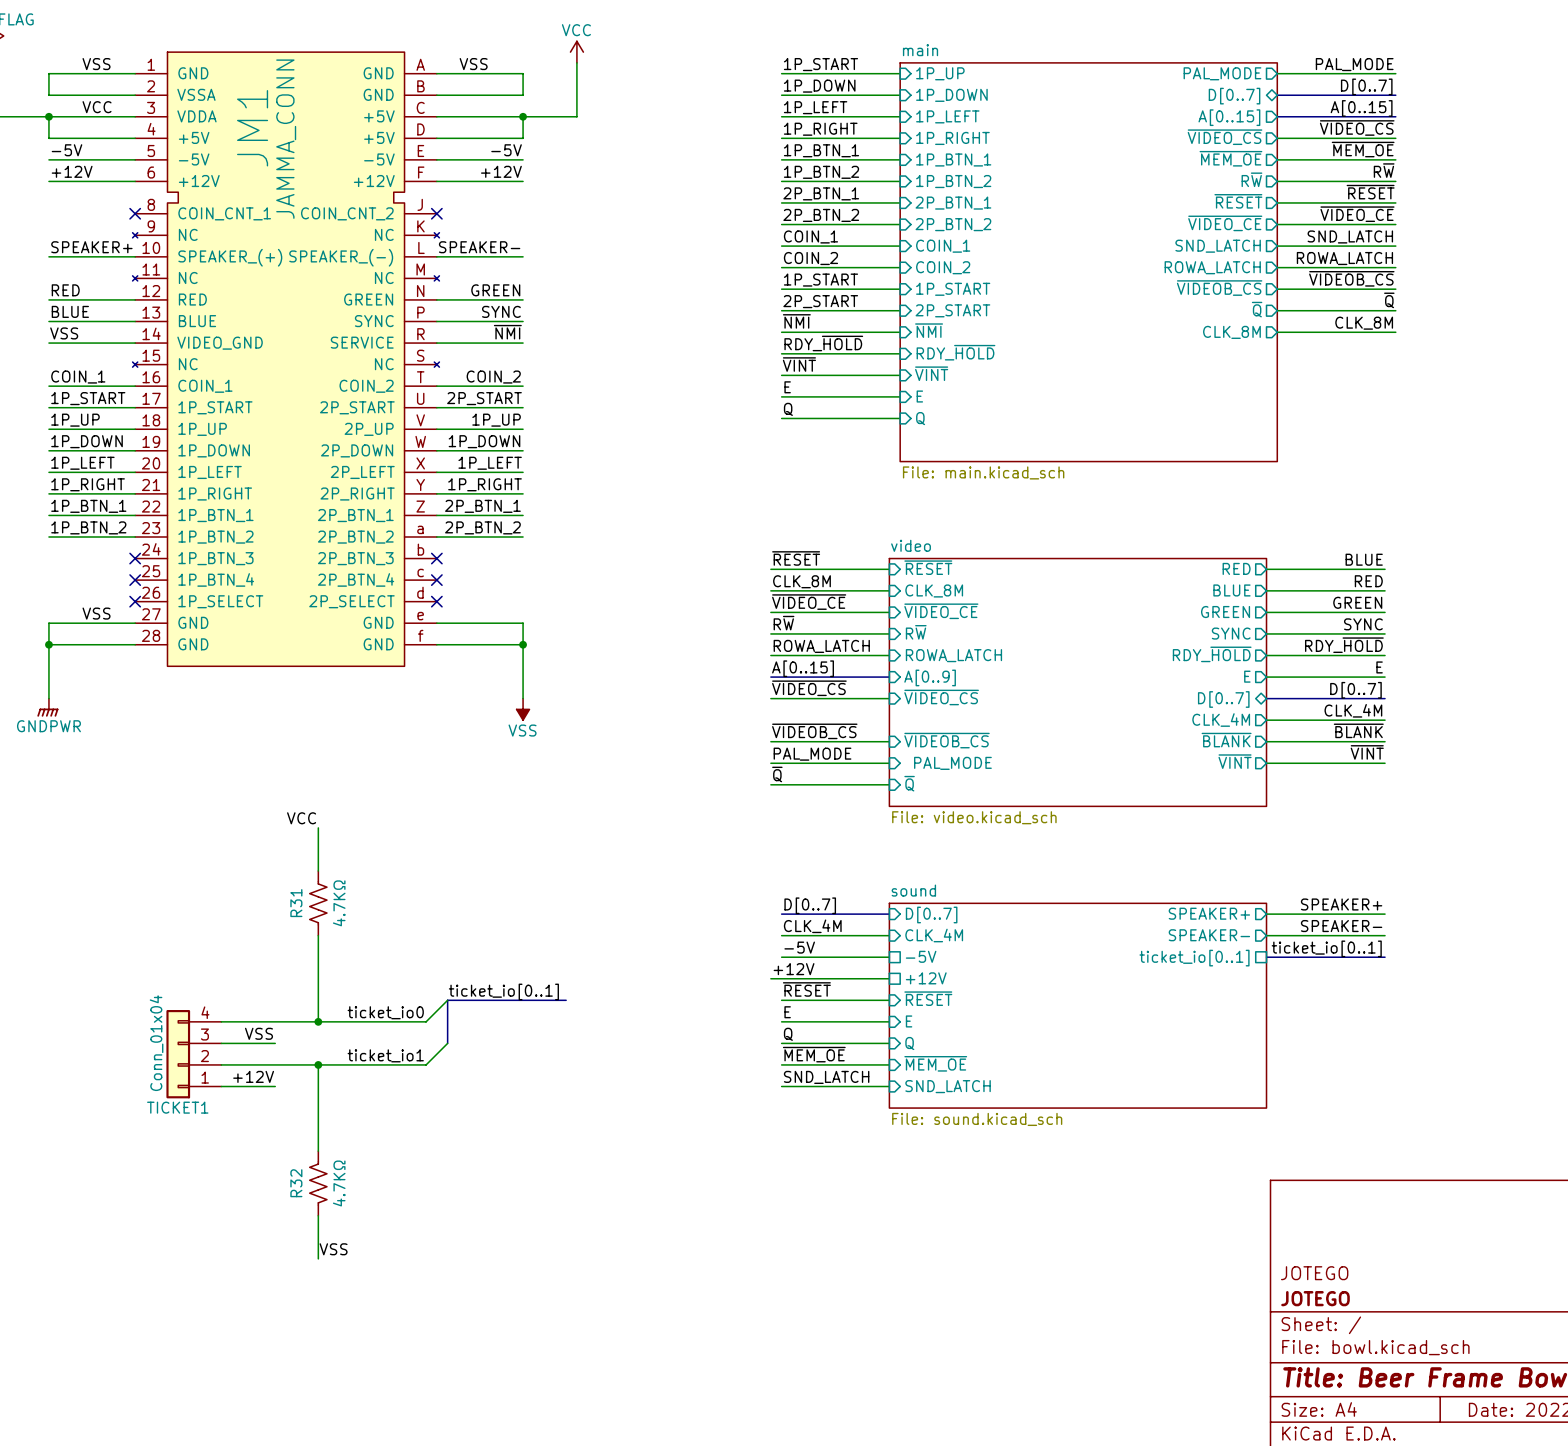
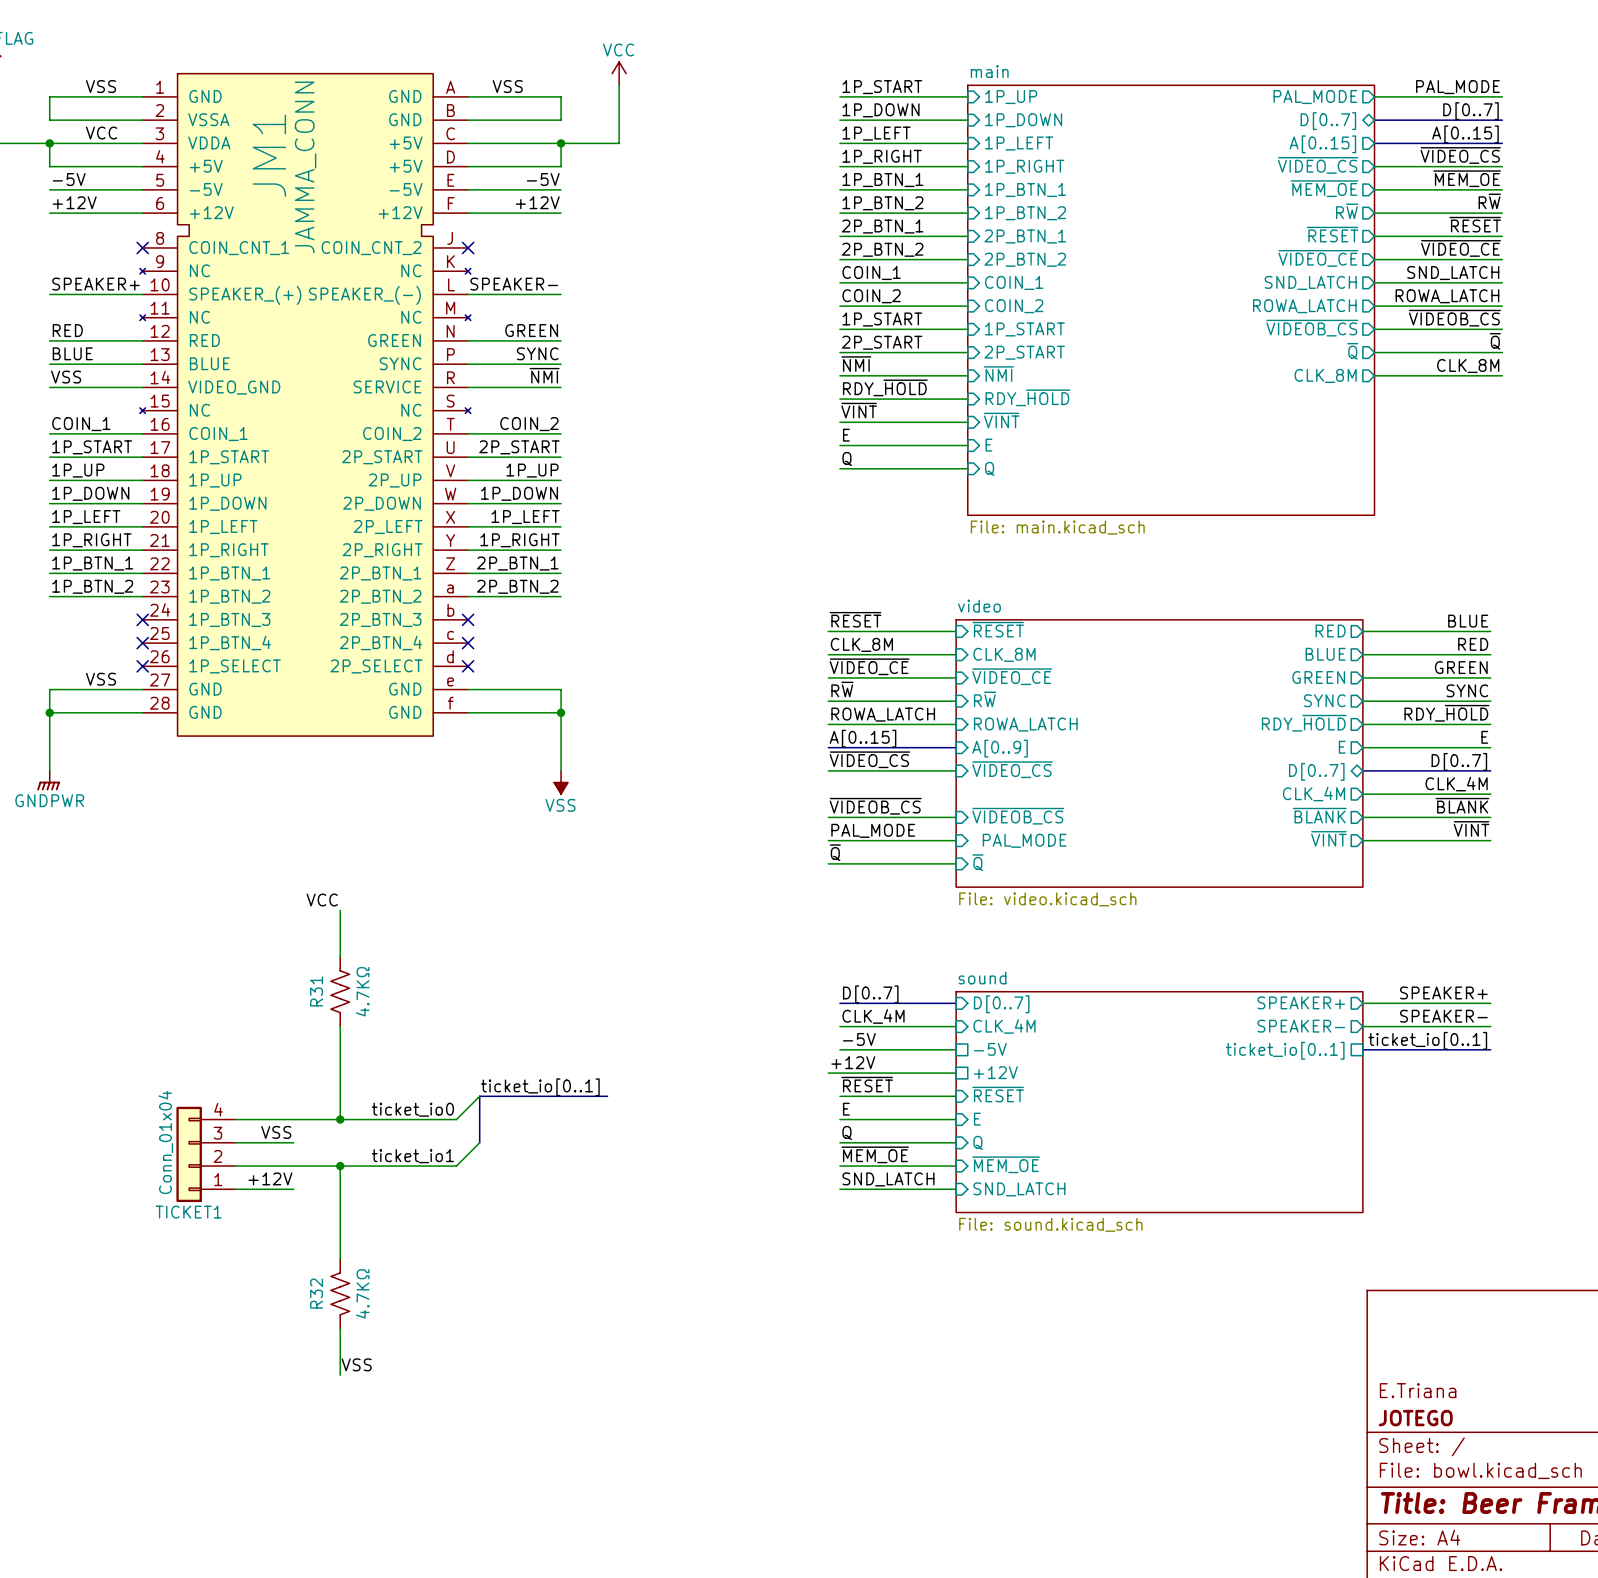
title block: JOTEGO (1314, 1273) -> E.Triana (1418, 1390)

